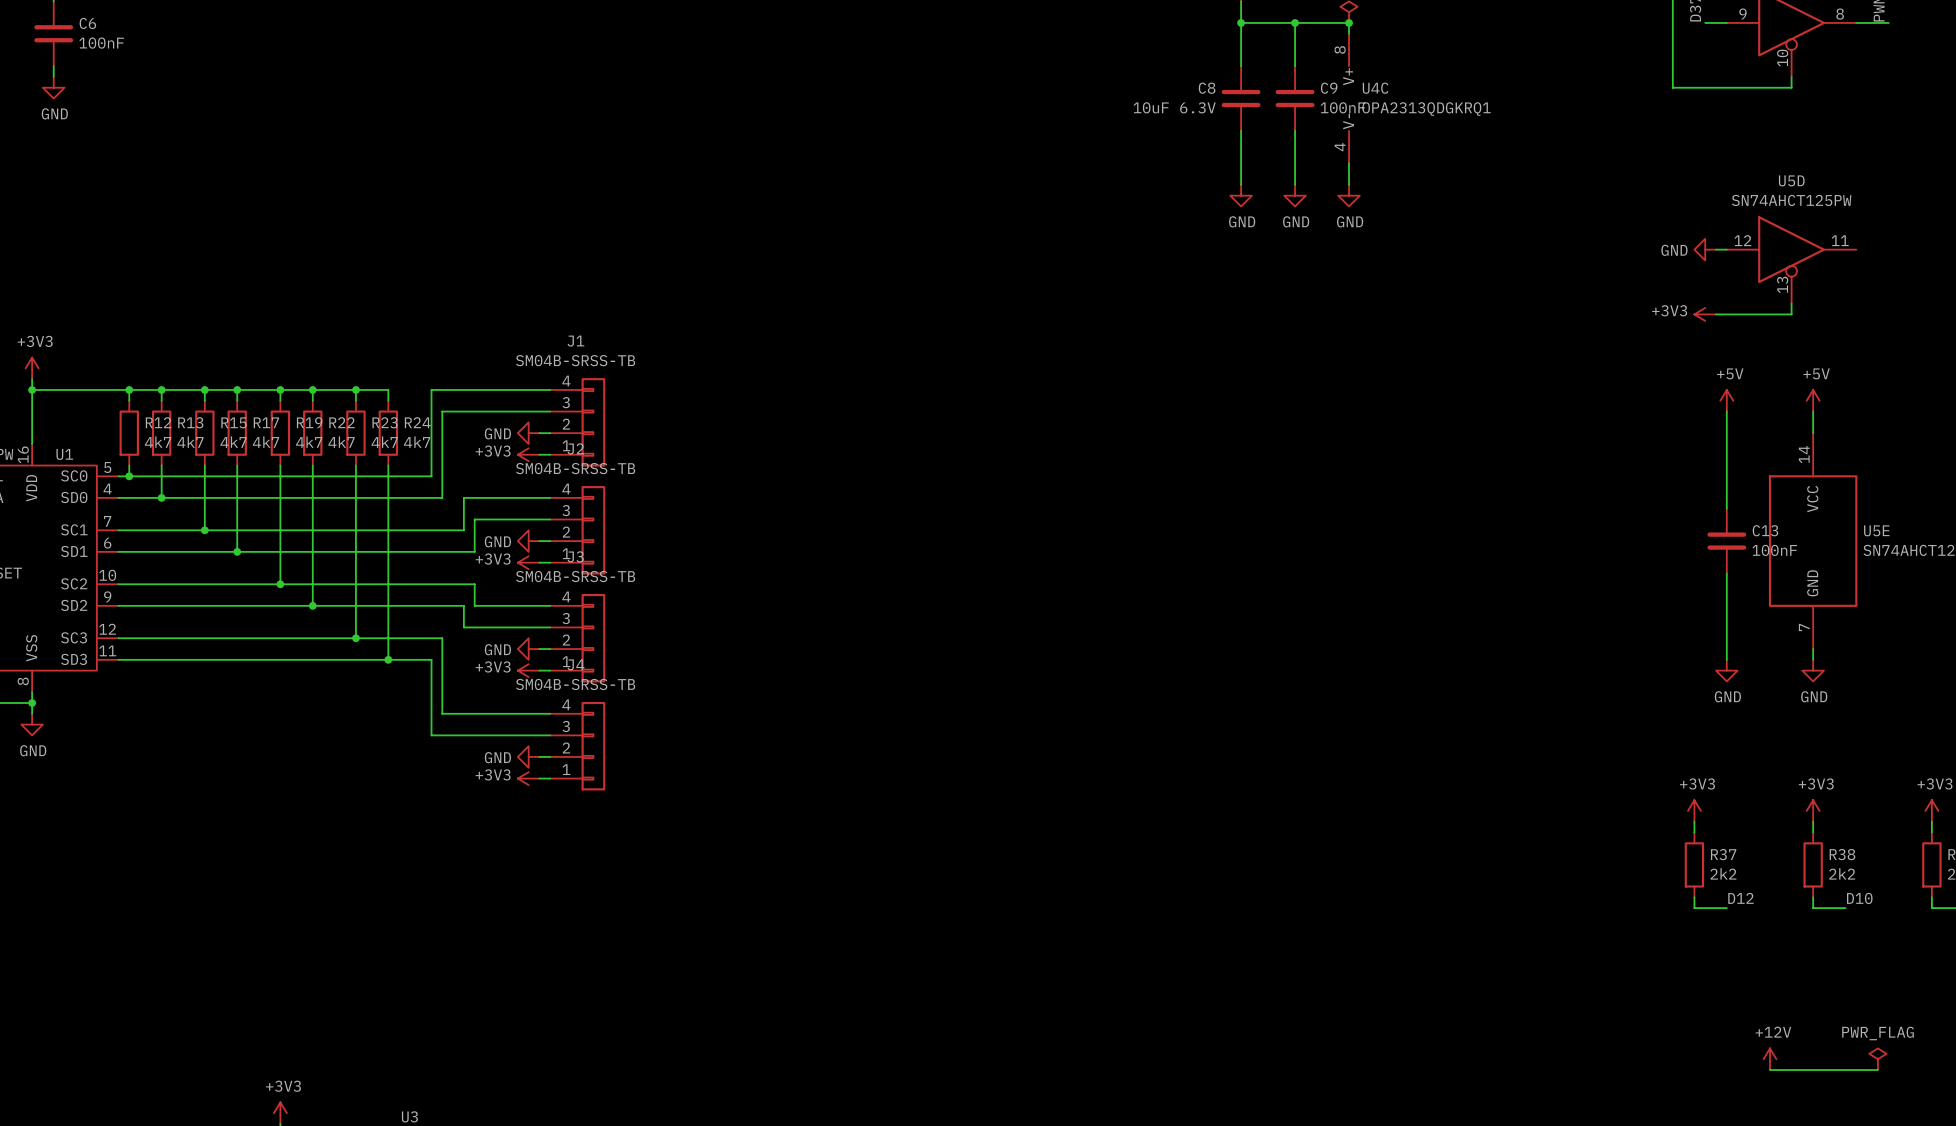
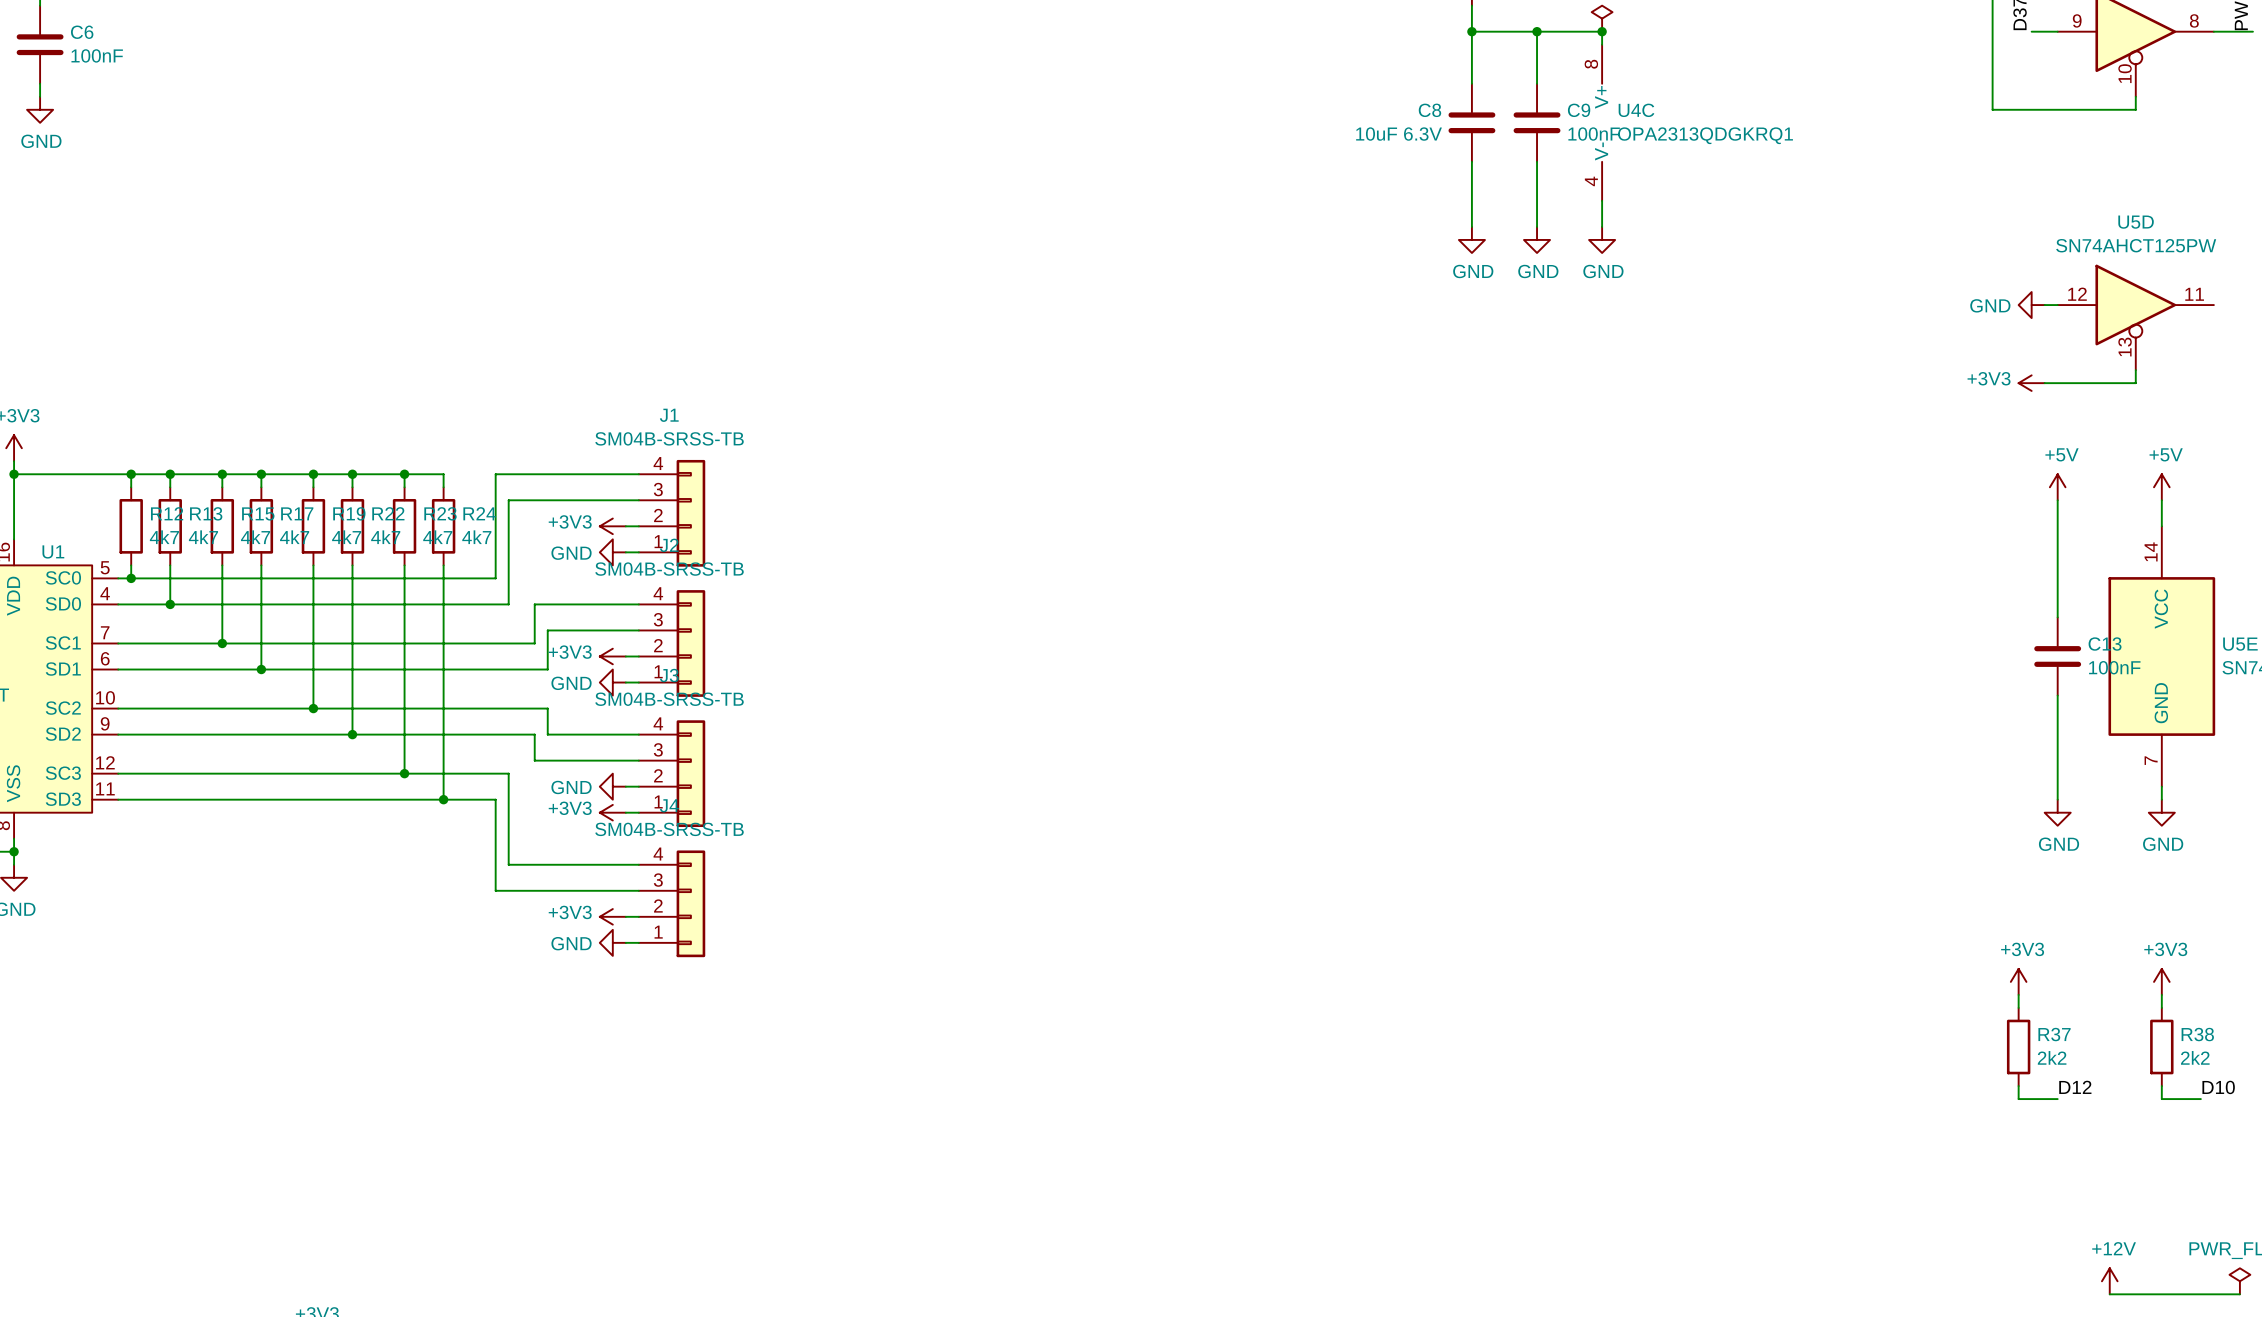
power symbol: GND (528, 433) -> +3V3 (612, 526)
power symbol: +3V3 (528, 454) -> GND (612, 552)
power symbol: GND (528, 541) -> +3V3 (612, 656)
power symbol: +3V3 (528, 562) -> GND (612, 682)
power symbol: GND (528, 756) -> +3V3 (612, 916)
power symbol: +3V3 (528, 778) -> GND (612, 942)

